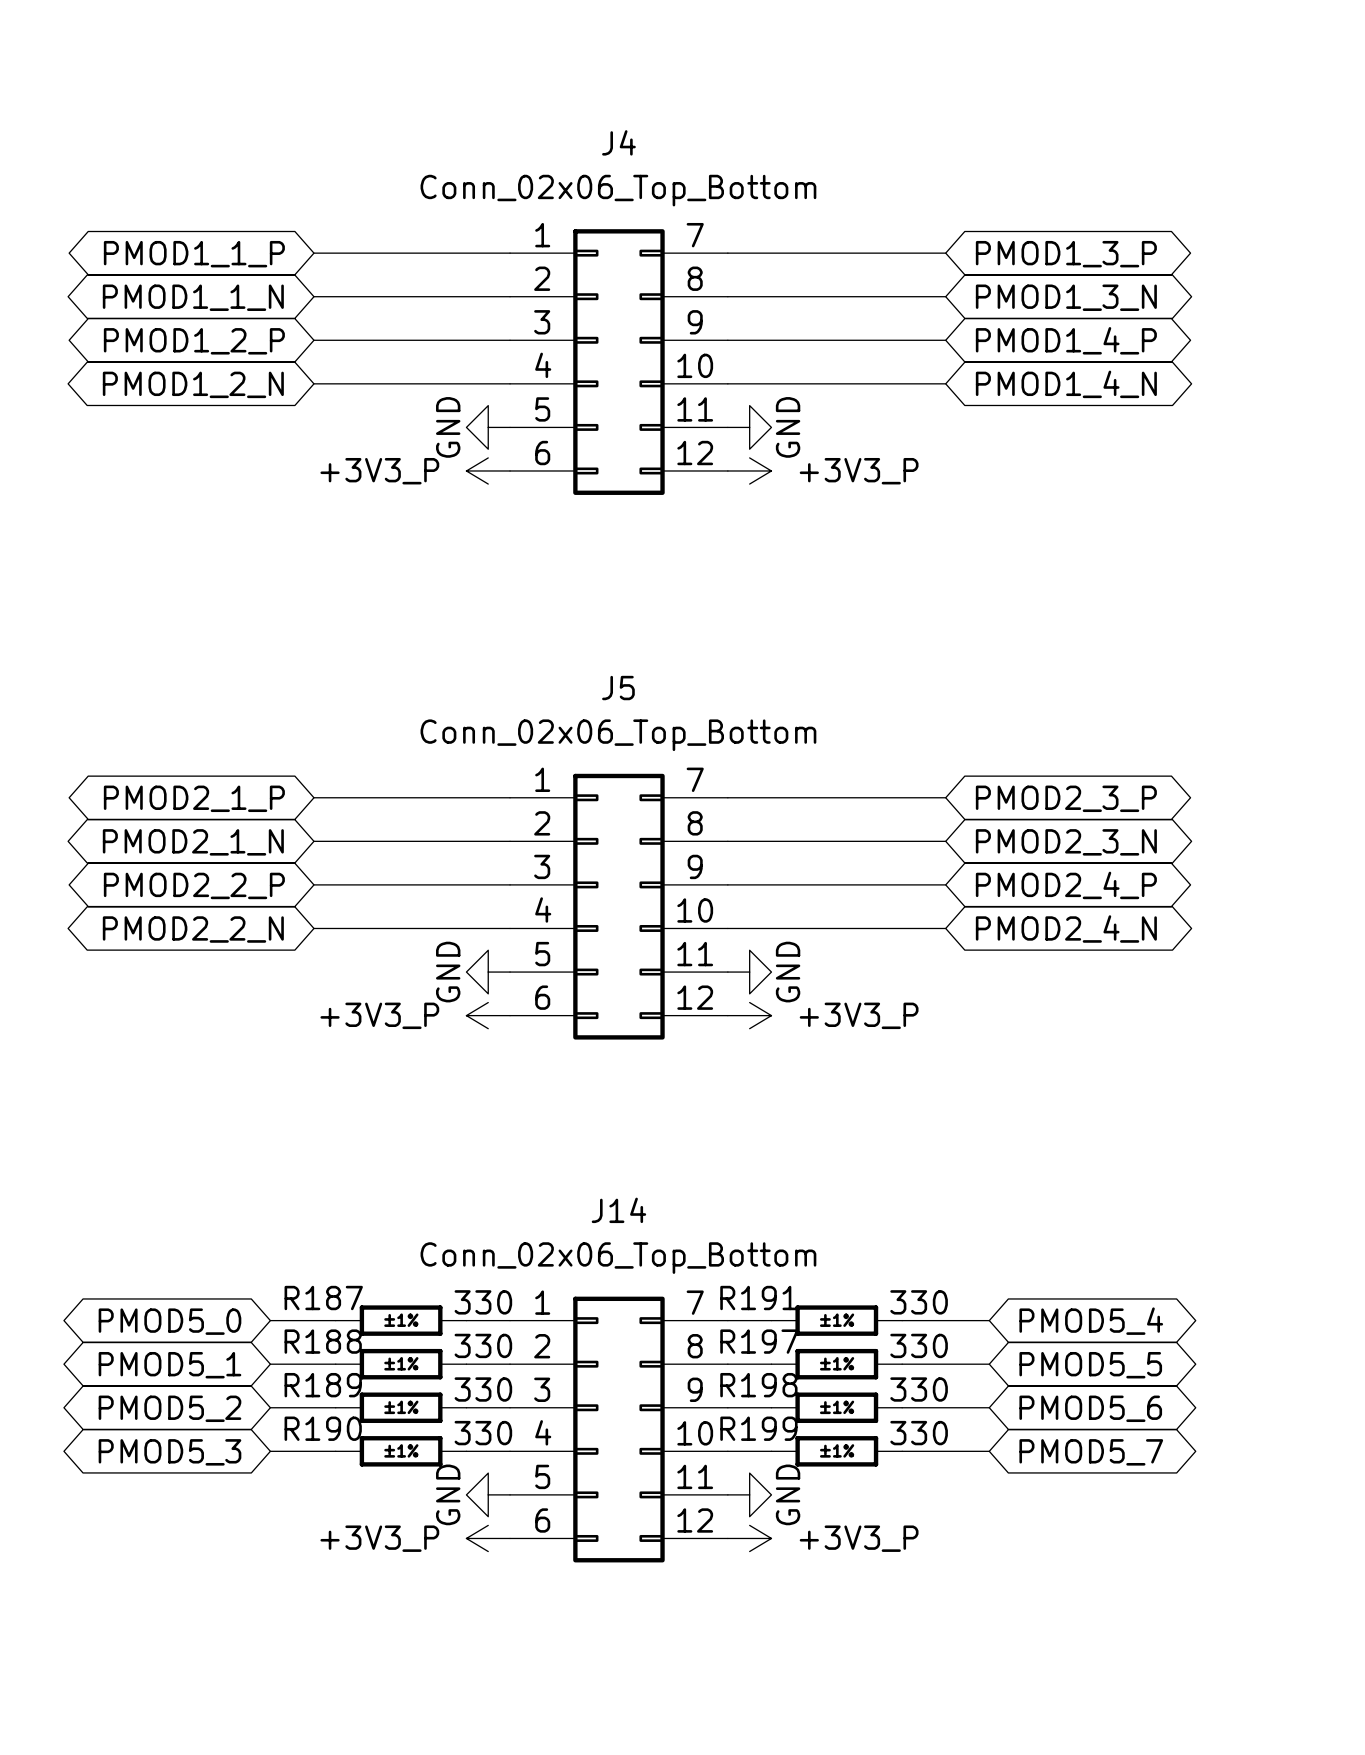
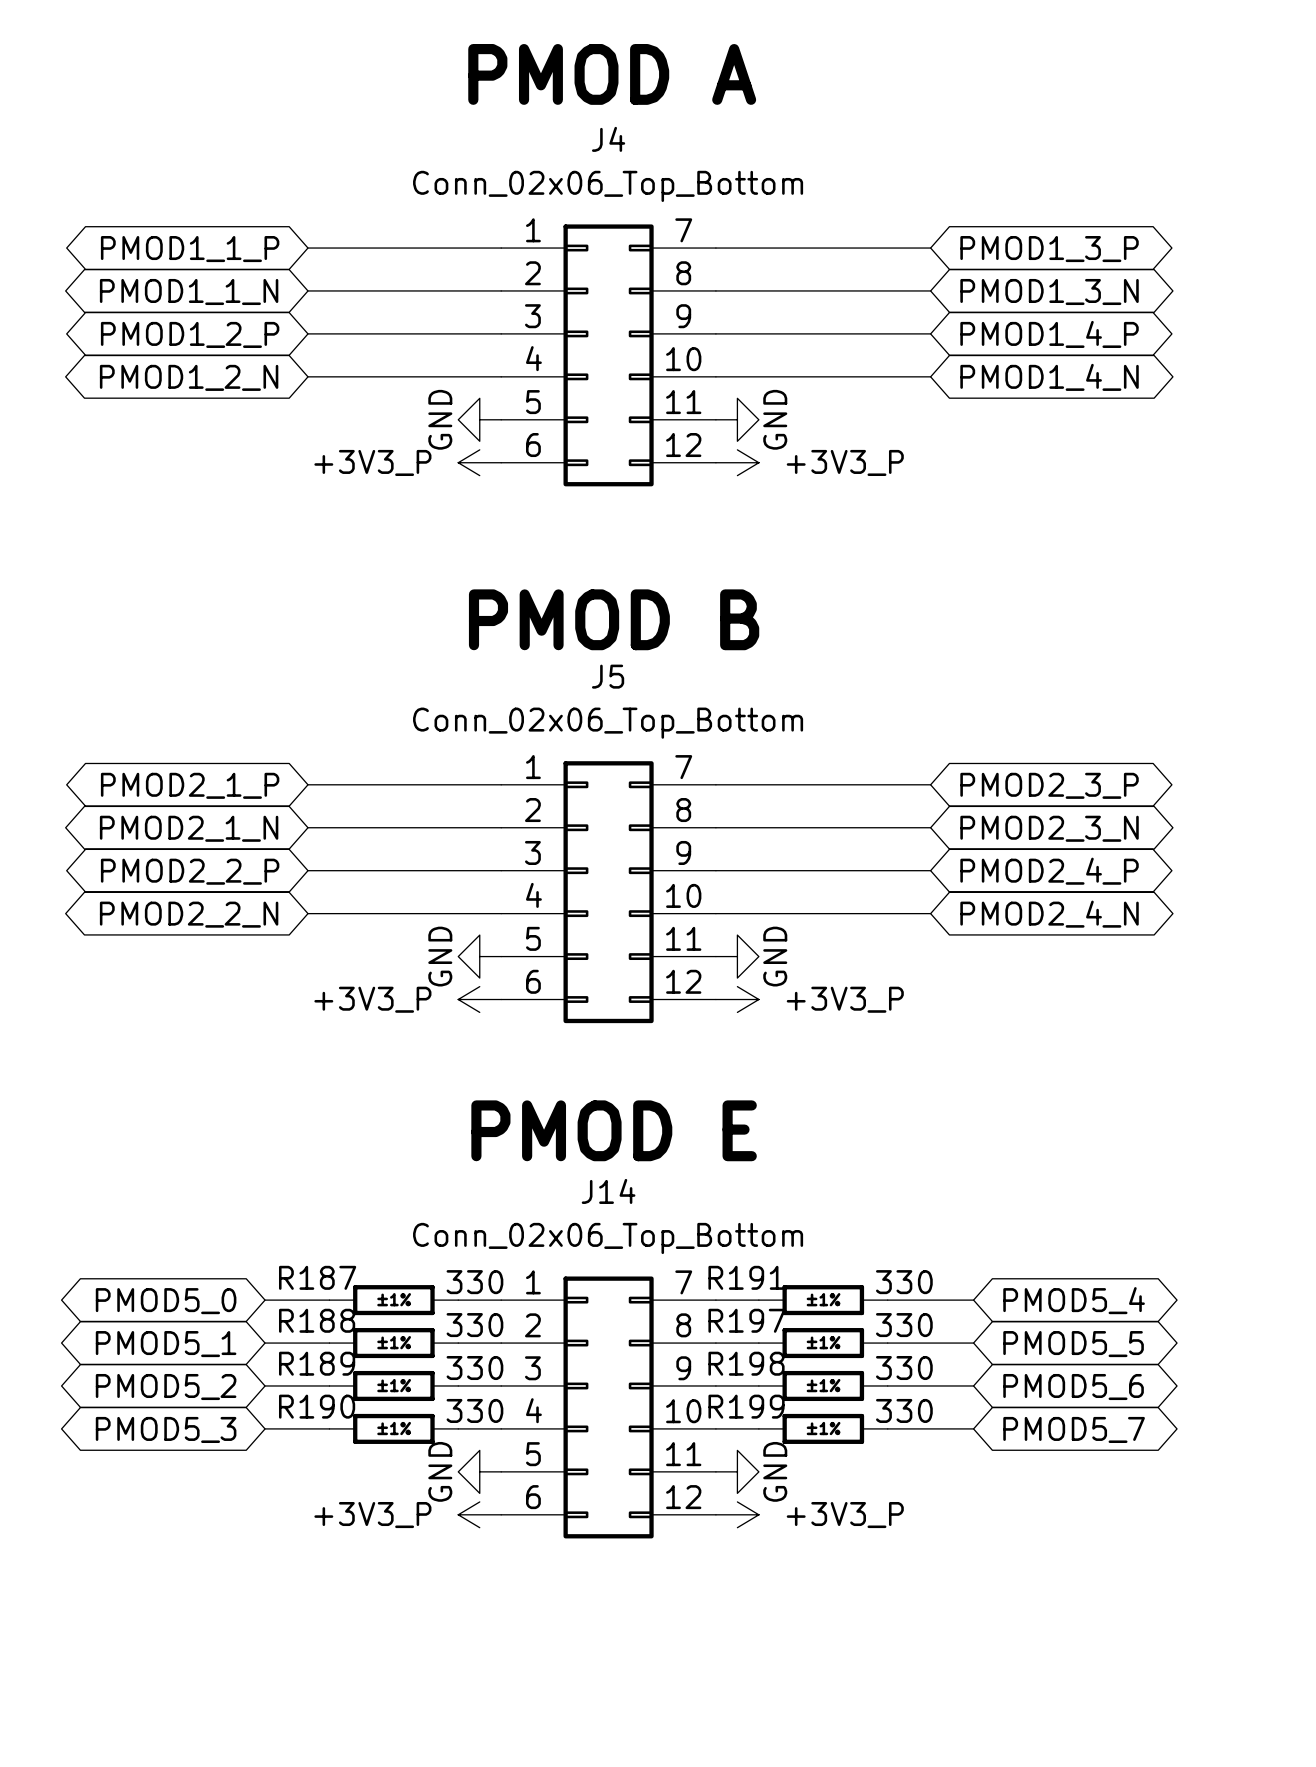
text: none -> PMOD A (612, 74)
text: none -> PMOD B (614, 619)
text: none -> PMOD E (614, 1130)

